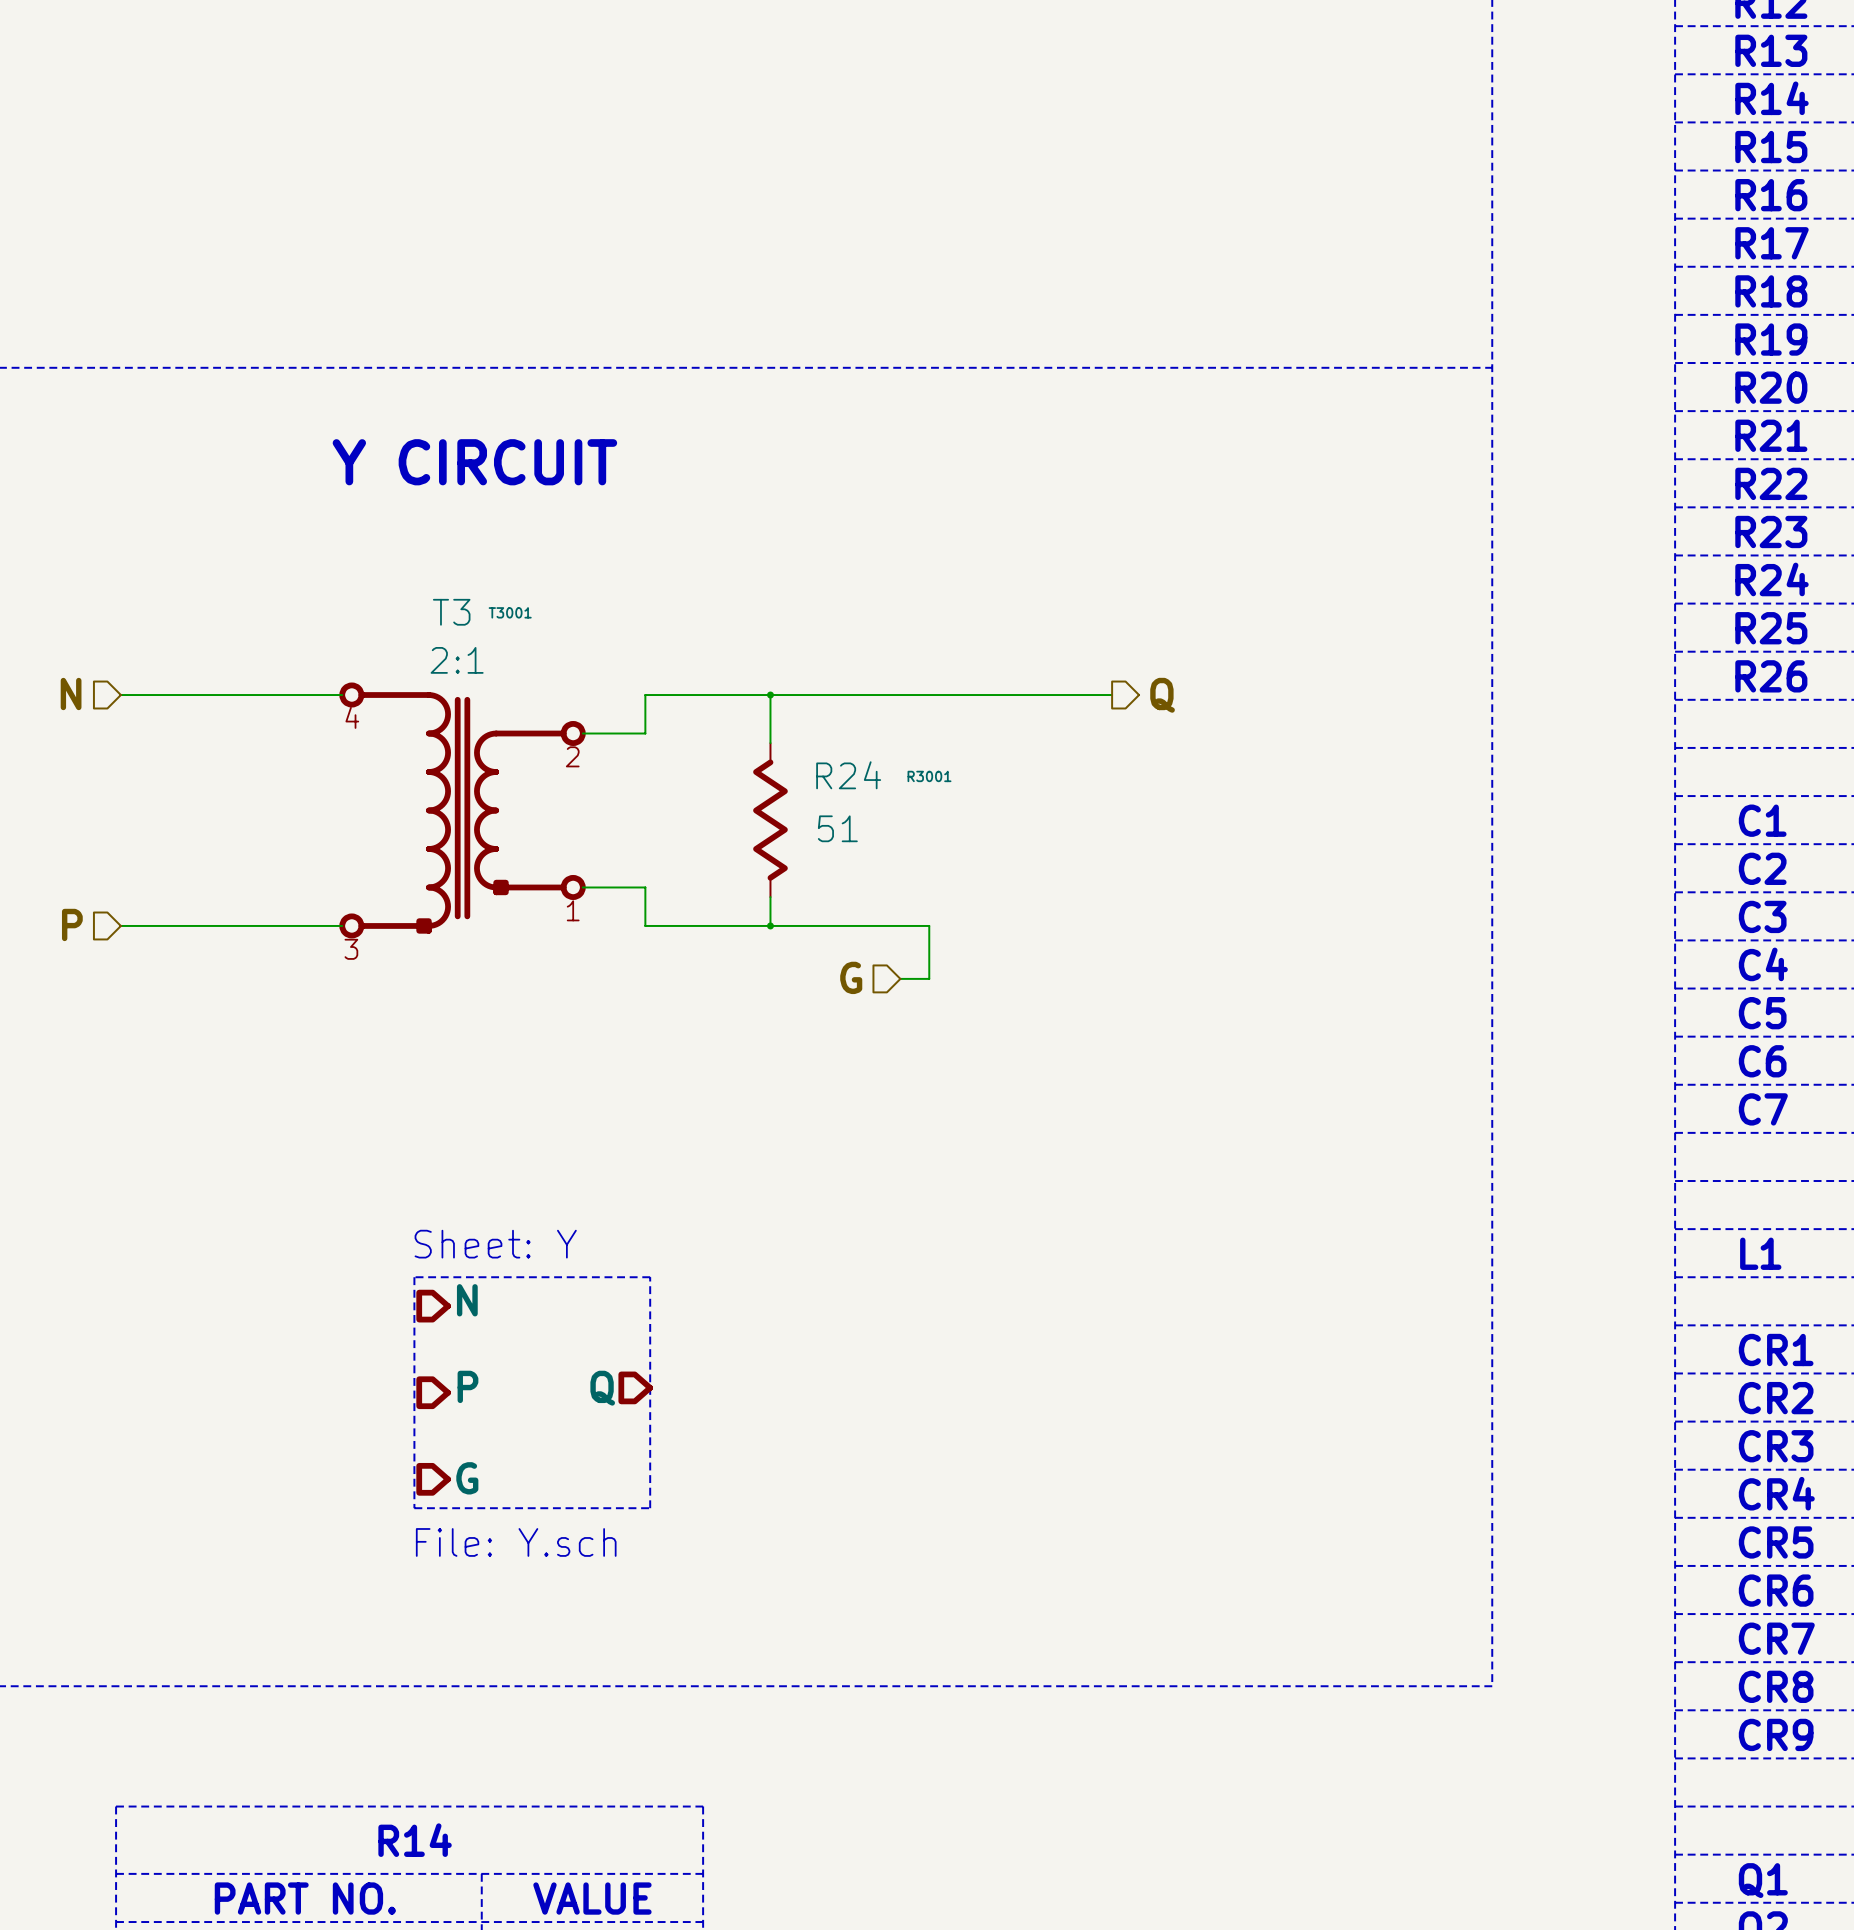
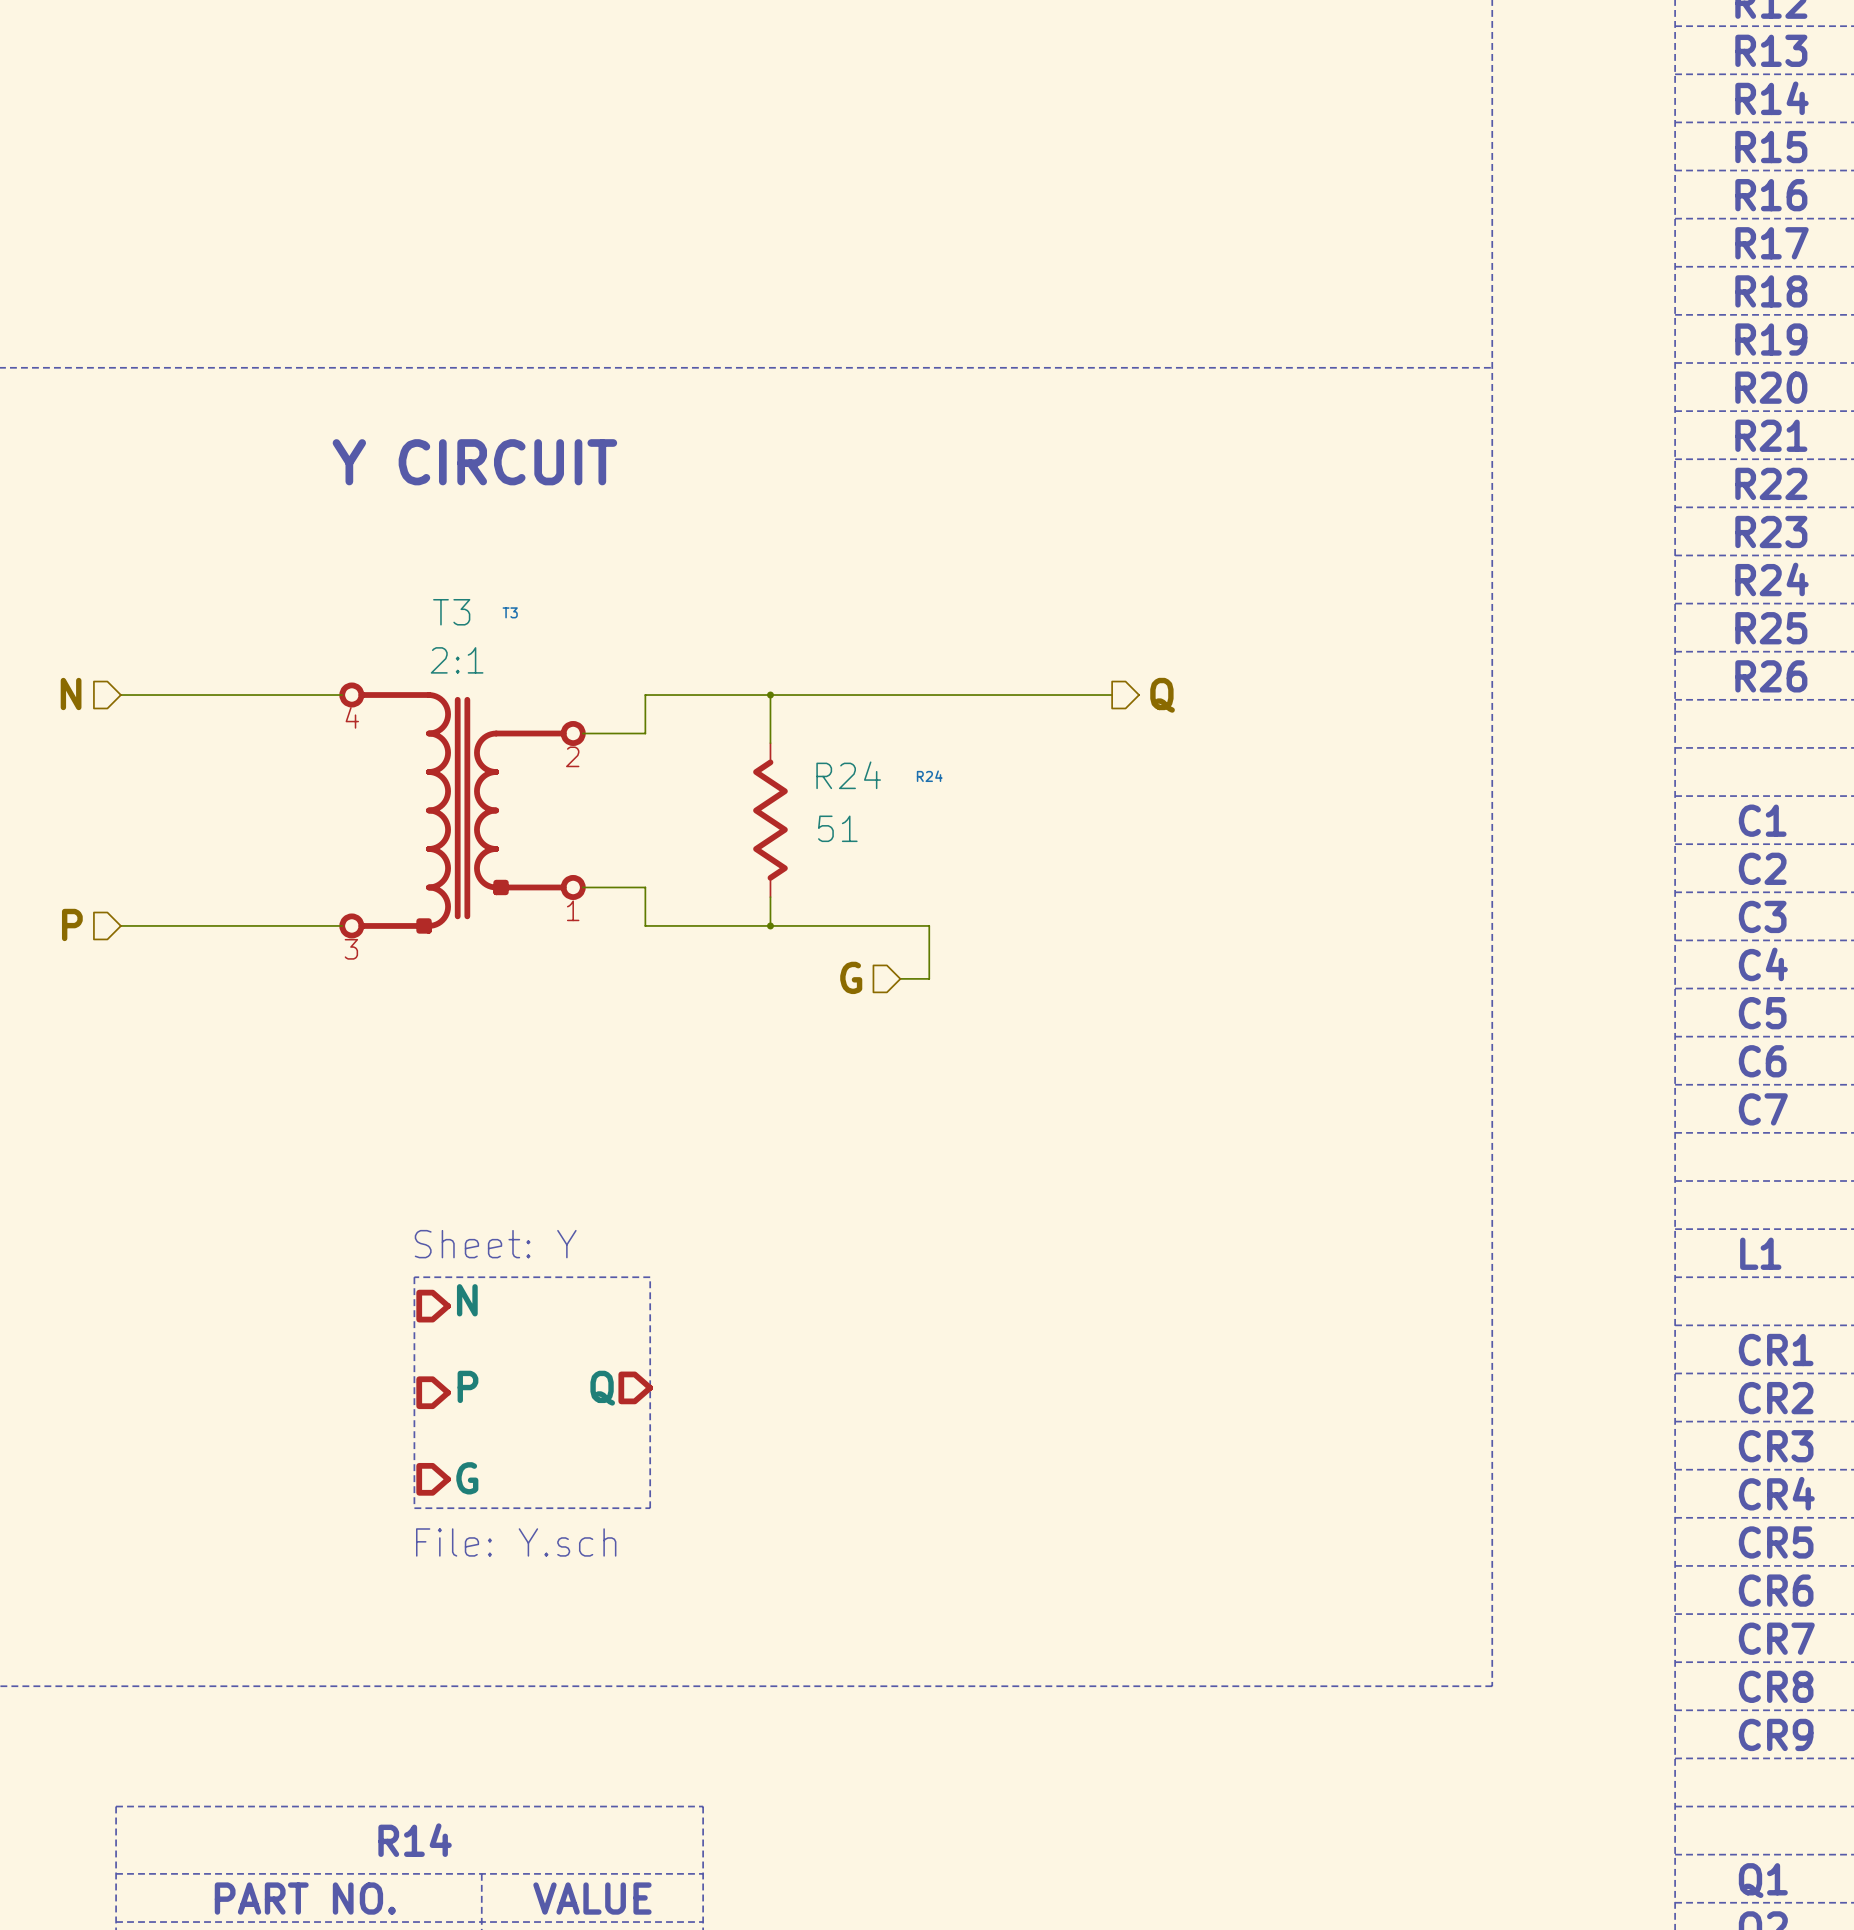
T3001 name: T3001 (510, 612) -> T3 (510, 612)
R3001 name: R3001 (929, 776) -> R24 (929, 776)

